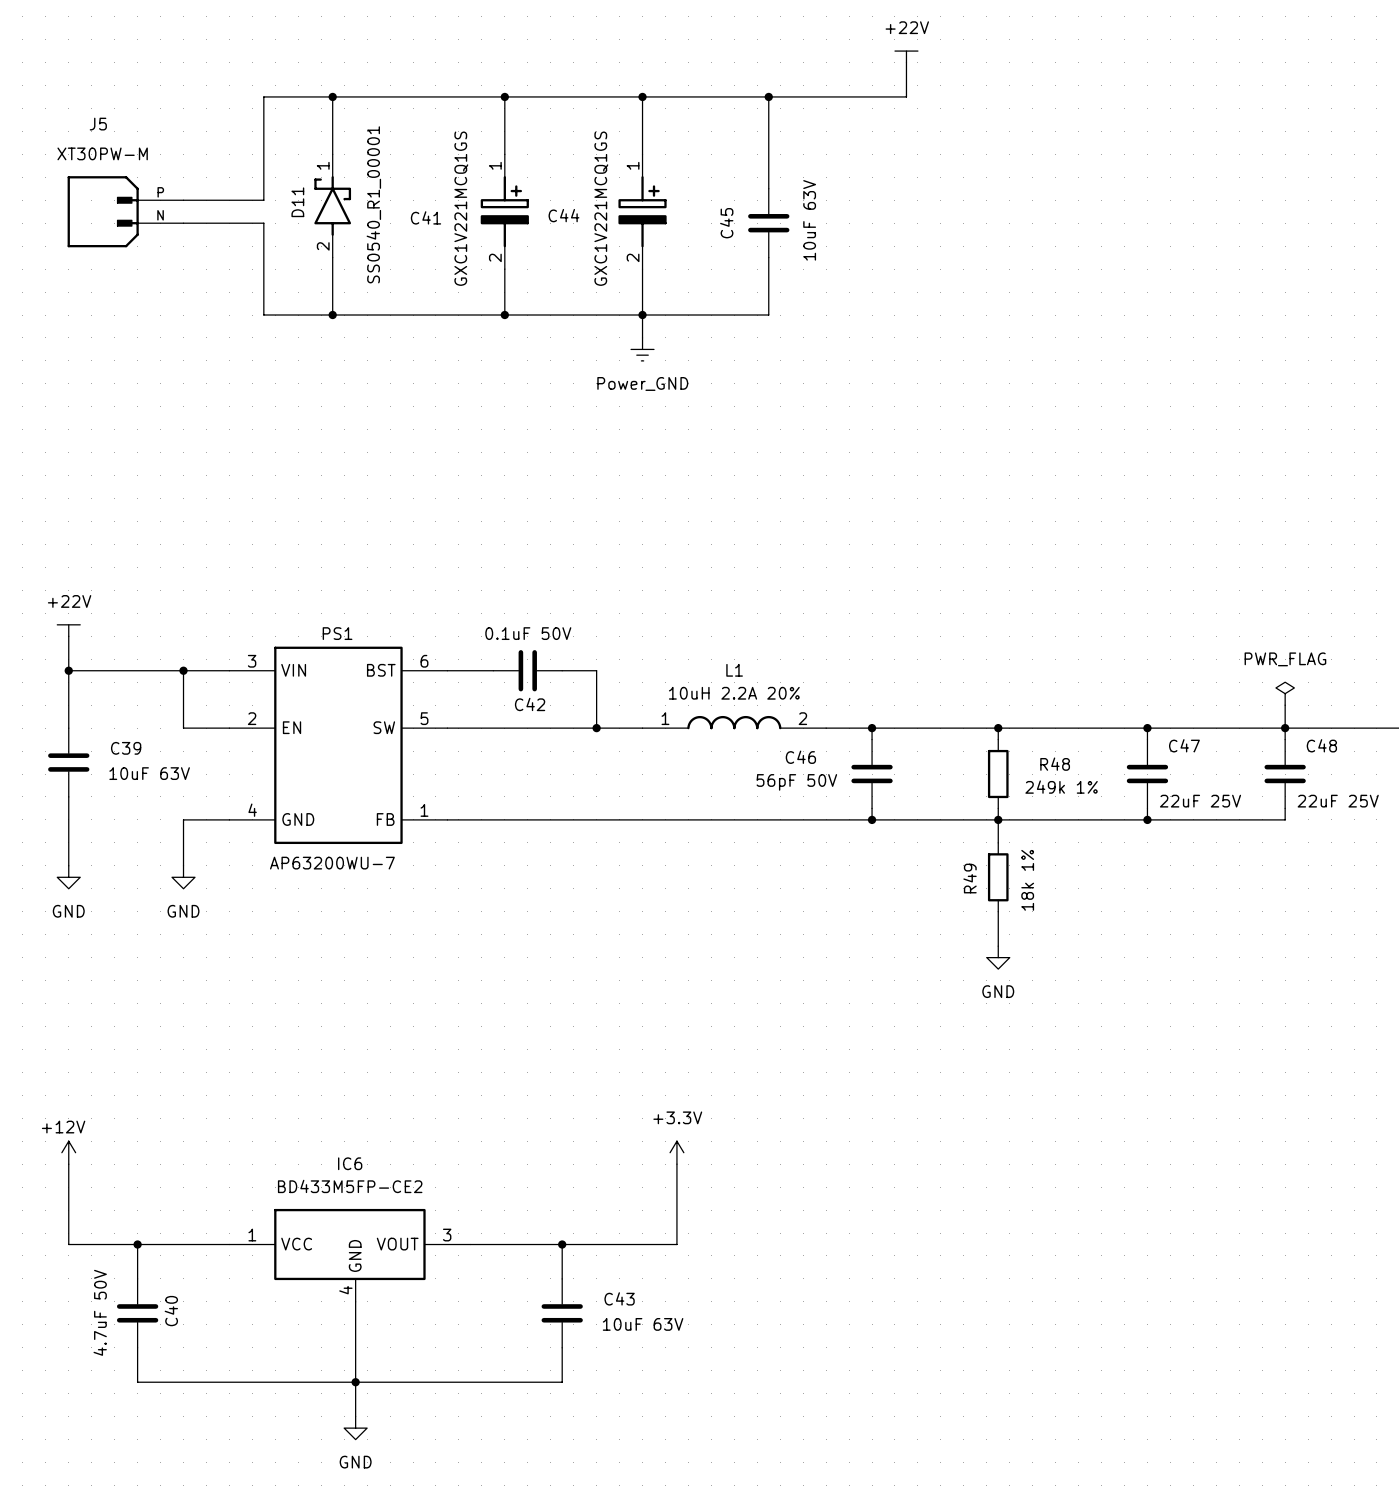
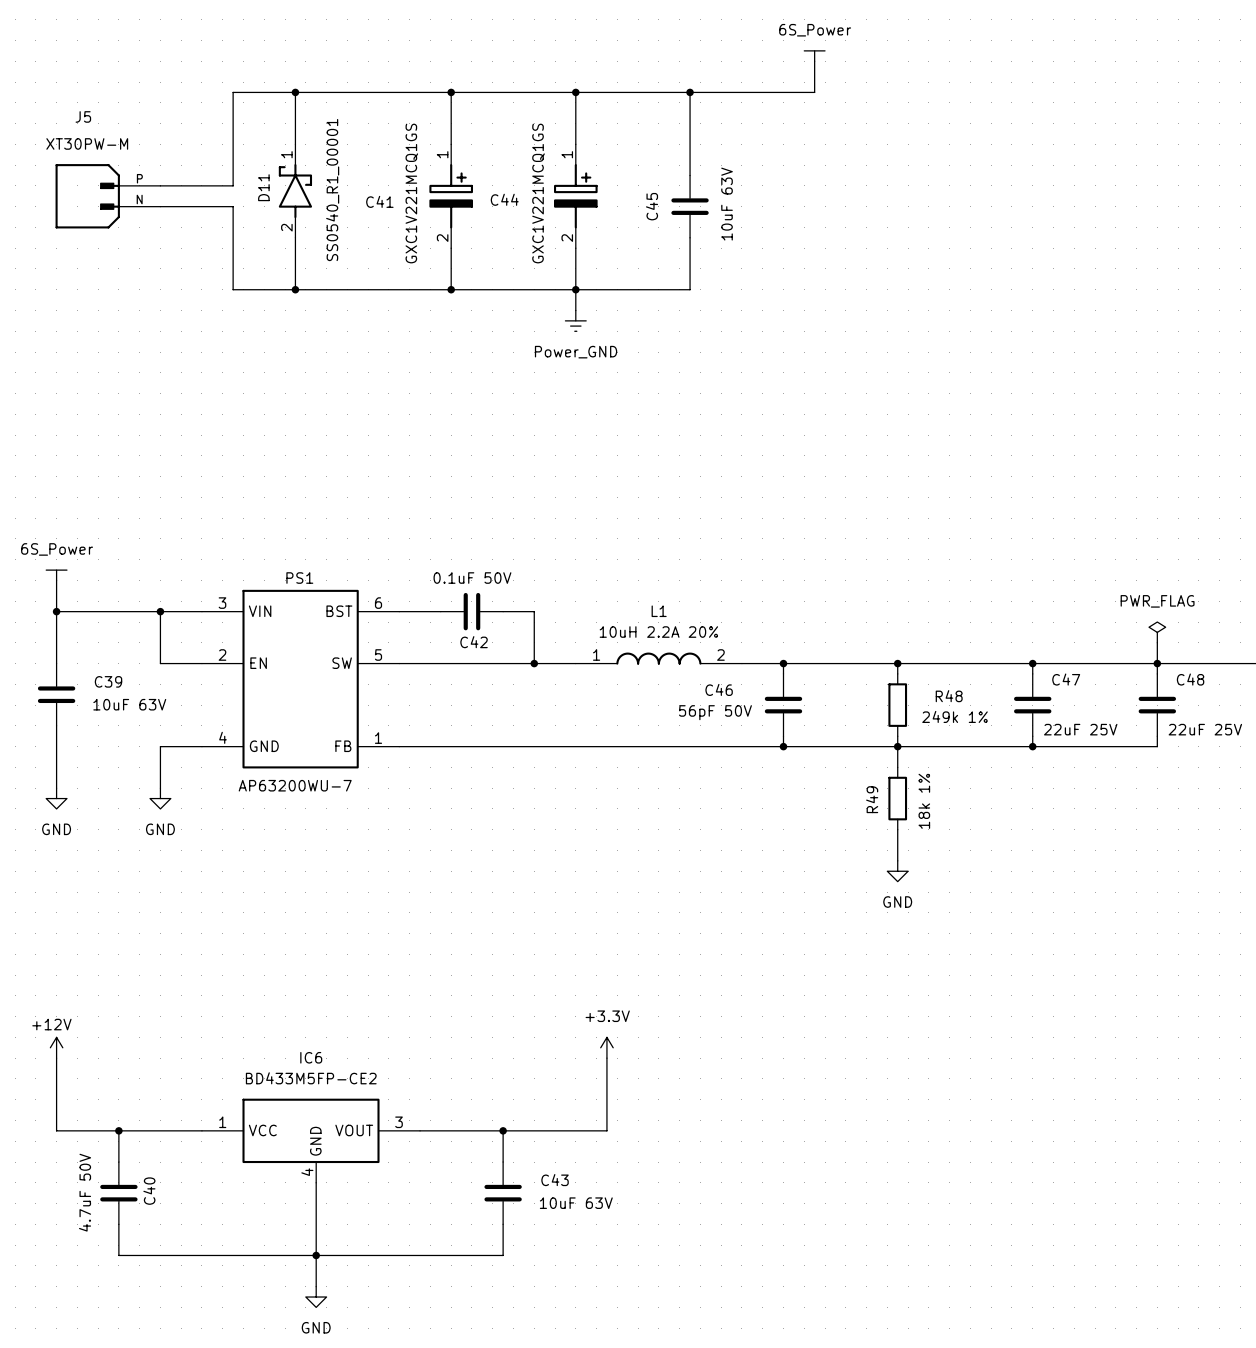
power symbol: +22V (906, 56) -> 6S_Power (814, 56)
power symbol: +22V (68, 630) -> 6S_Power (56, 575)

